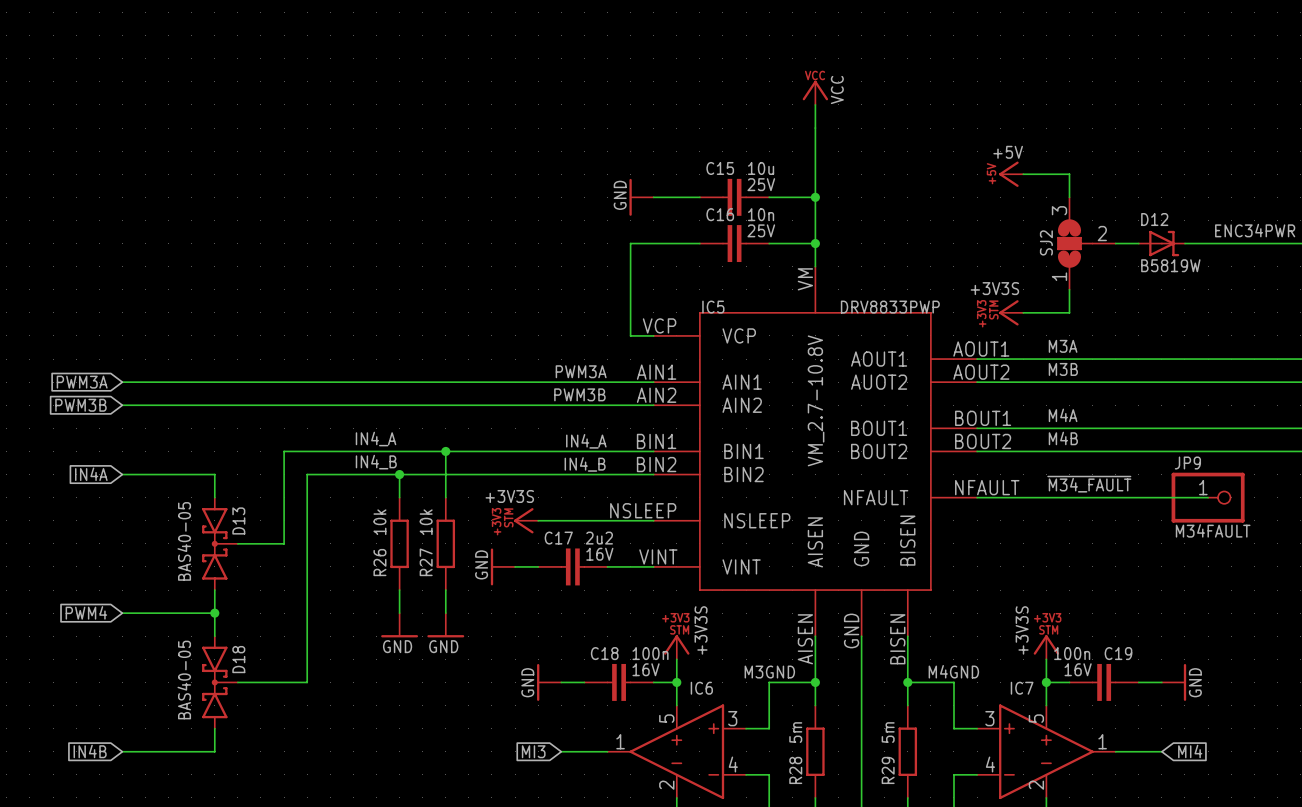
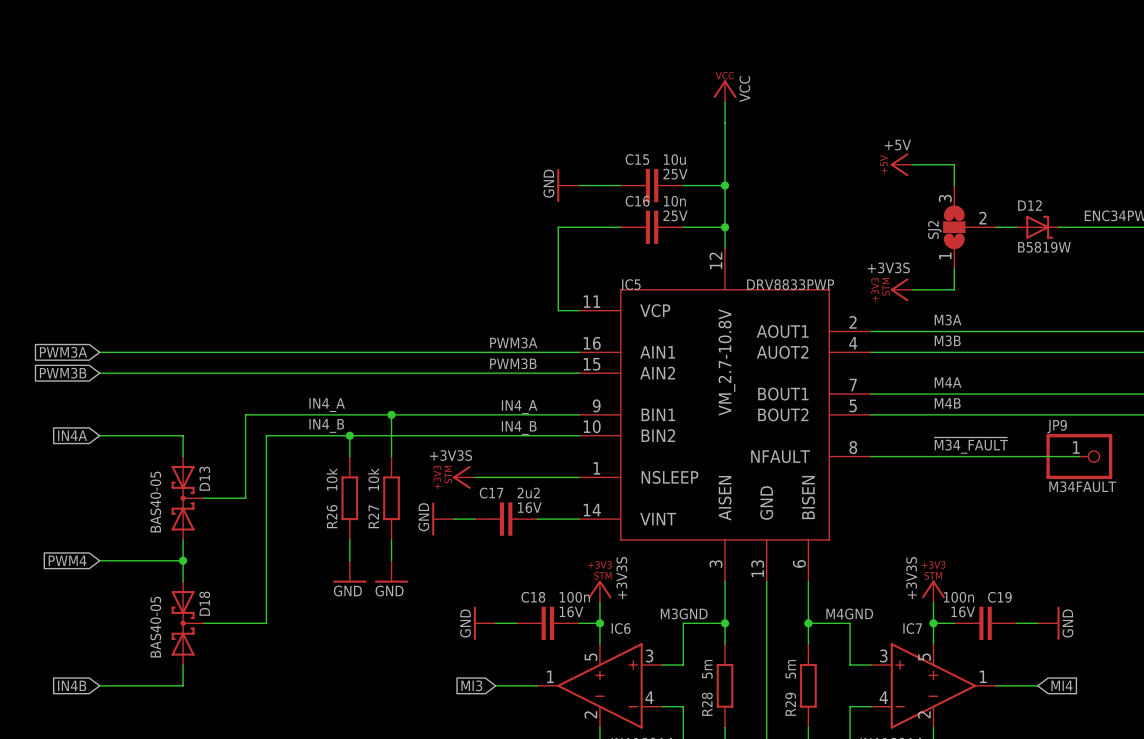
IC5 symbol: [653, 266, 978, 637] -> [579, 248, 871, 582]
D13 symbol: [202, 496, 238, 591] -> [171, 455, 204, 541]
D18 symbol: [202, 635, 238, 730] -> [171, 581, 204, 666]

